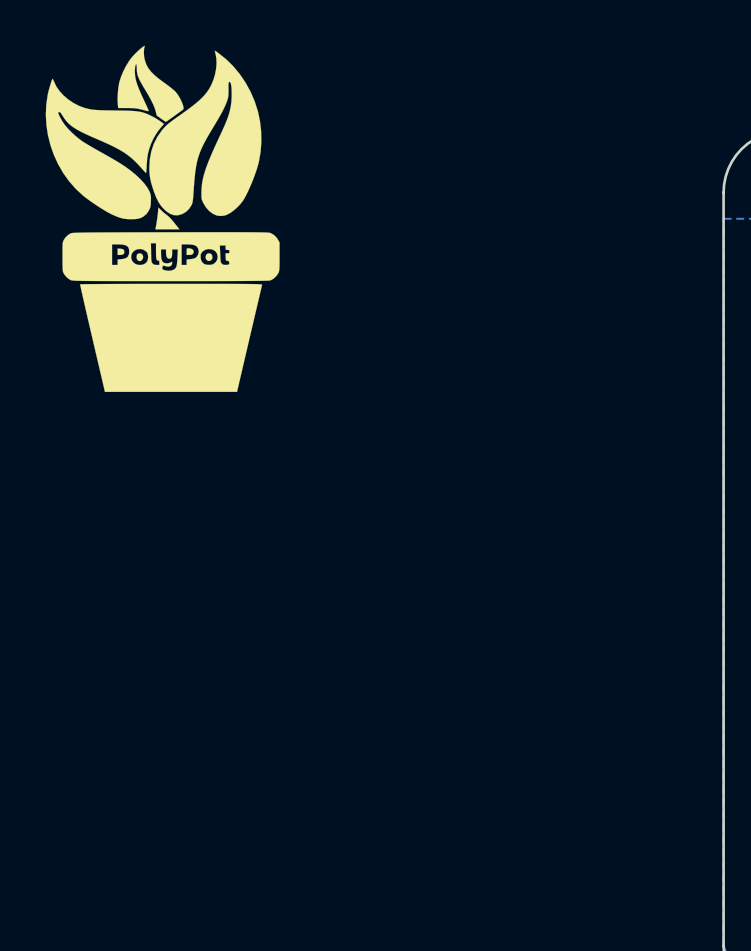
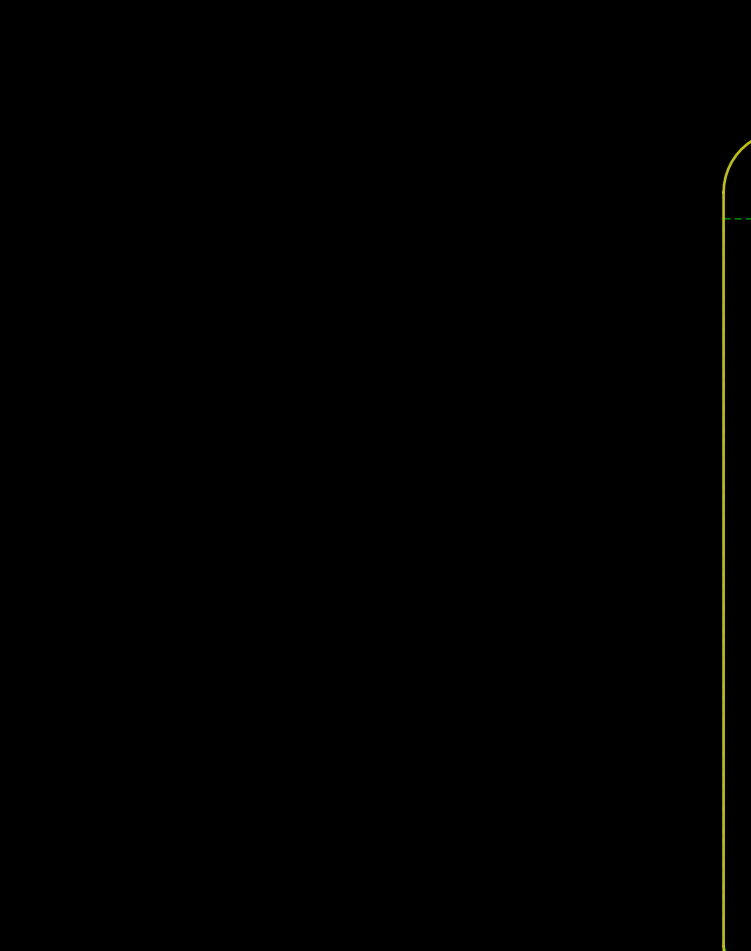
drawing: [45, 45, 280, 392] -> none

